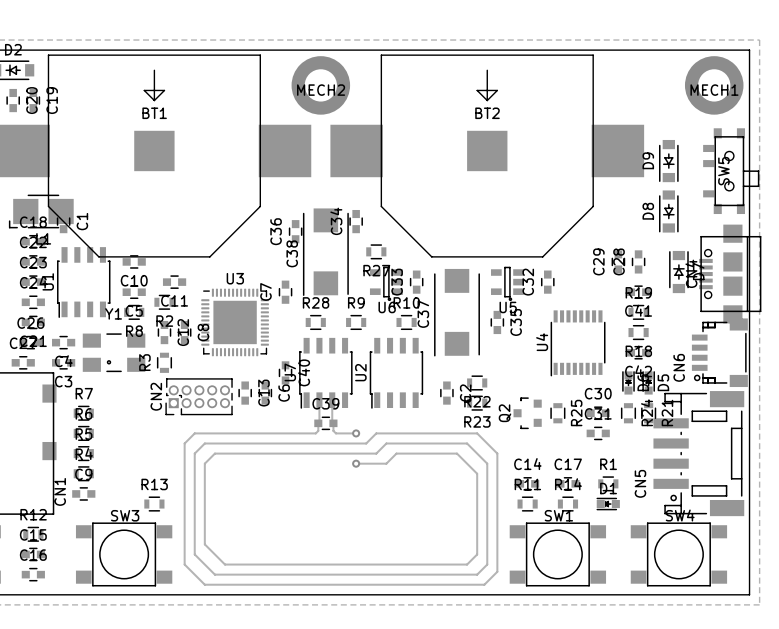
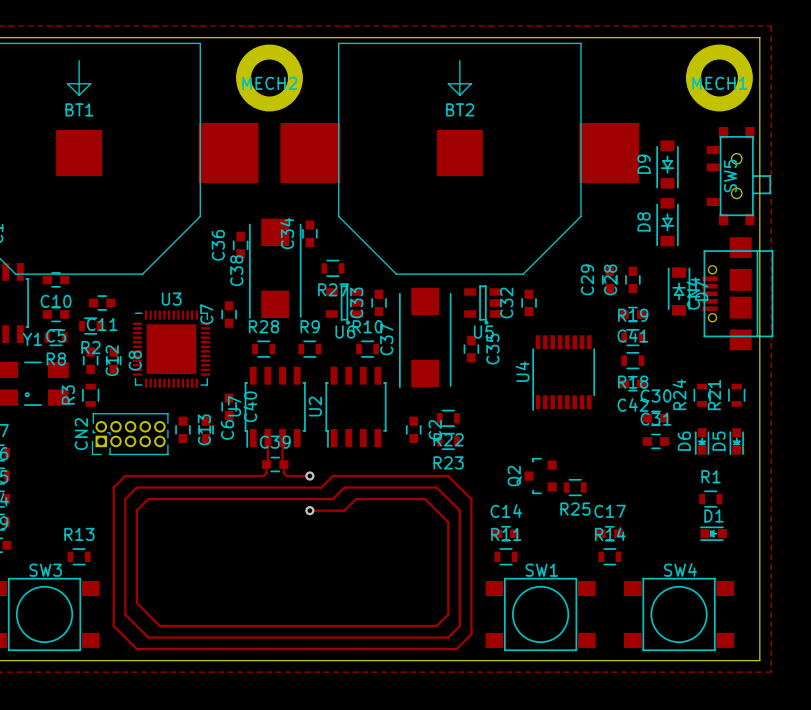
CN6: (719, 352) -> none
D6 rotation: 0° (628, 382) -> 180° (702, 441)
D6 position: (628, 382) -> (702, 441)
D5 rotation: 0° (648, 382) -> 180° (736, 441)
D5 position: (648, 382) -> (736, 441)
R24 name position: R24 (647, 412) -> R24 (679, 394)
Q2 position: (527, 413) -> (540, 476)
R25 rotation: 0° (557, 413) -> 90° clockwise (575, 487)
R25 position: (557, 413) -> (575, 487)
C30 position: (598, 413) -> (655, 418)
R24 position: (628, 413) -> (702, 395)
R21 position: (648, 413) -> (736, 395)
R21 name position: R21 (667, 413) -> R21 (714, 394)
C31 position: (598, 433) -> (655, 441)
CN5: (698, 453) -> none
C17 position: (567, 483) -> (609, 533)
R1 position: (608, 483) -> (710, 499)
R14 position: (567, 504) -> (609, 556)
D1 position: (608, 504) -> (713, 533)

